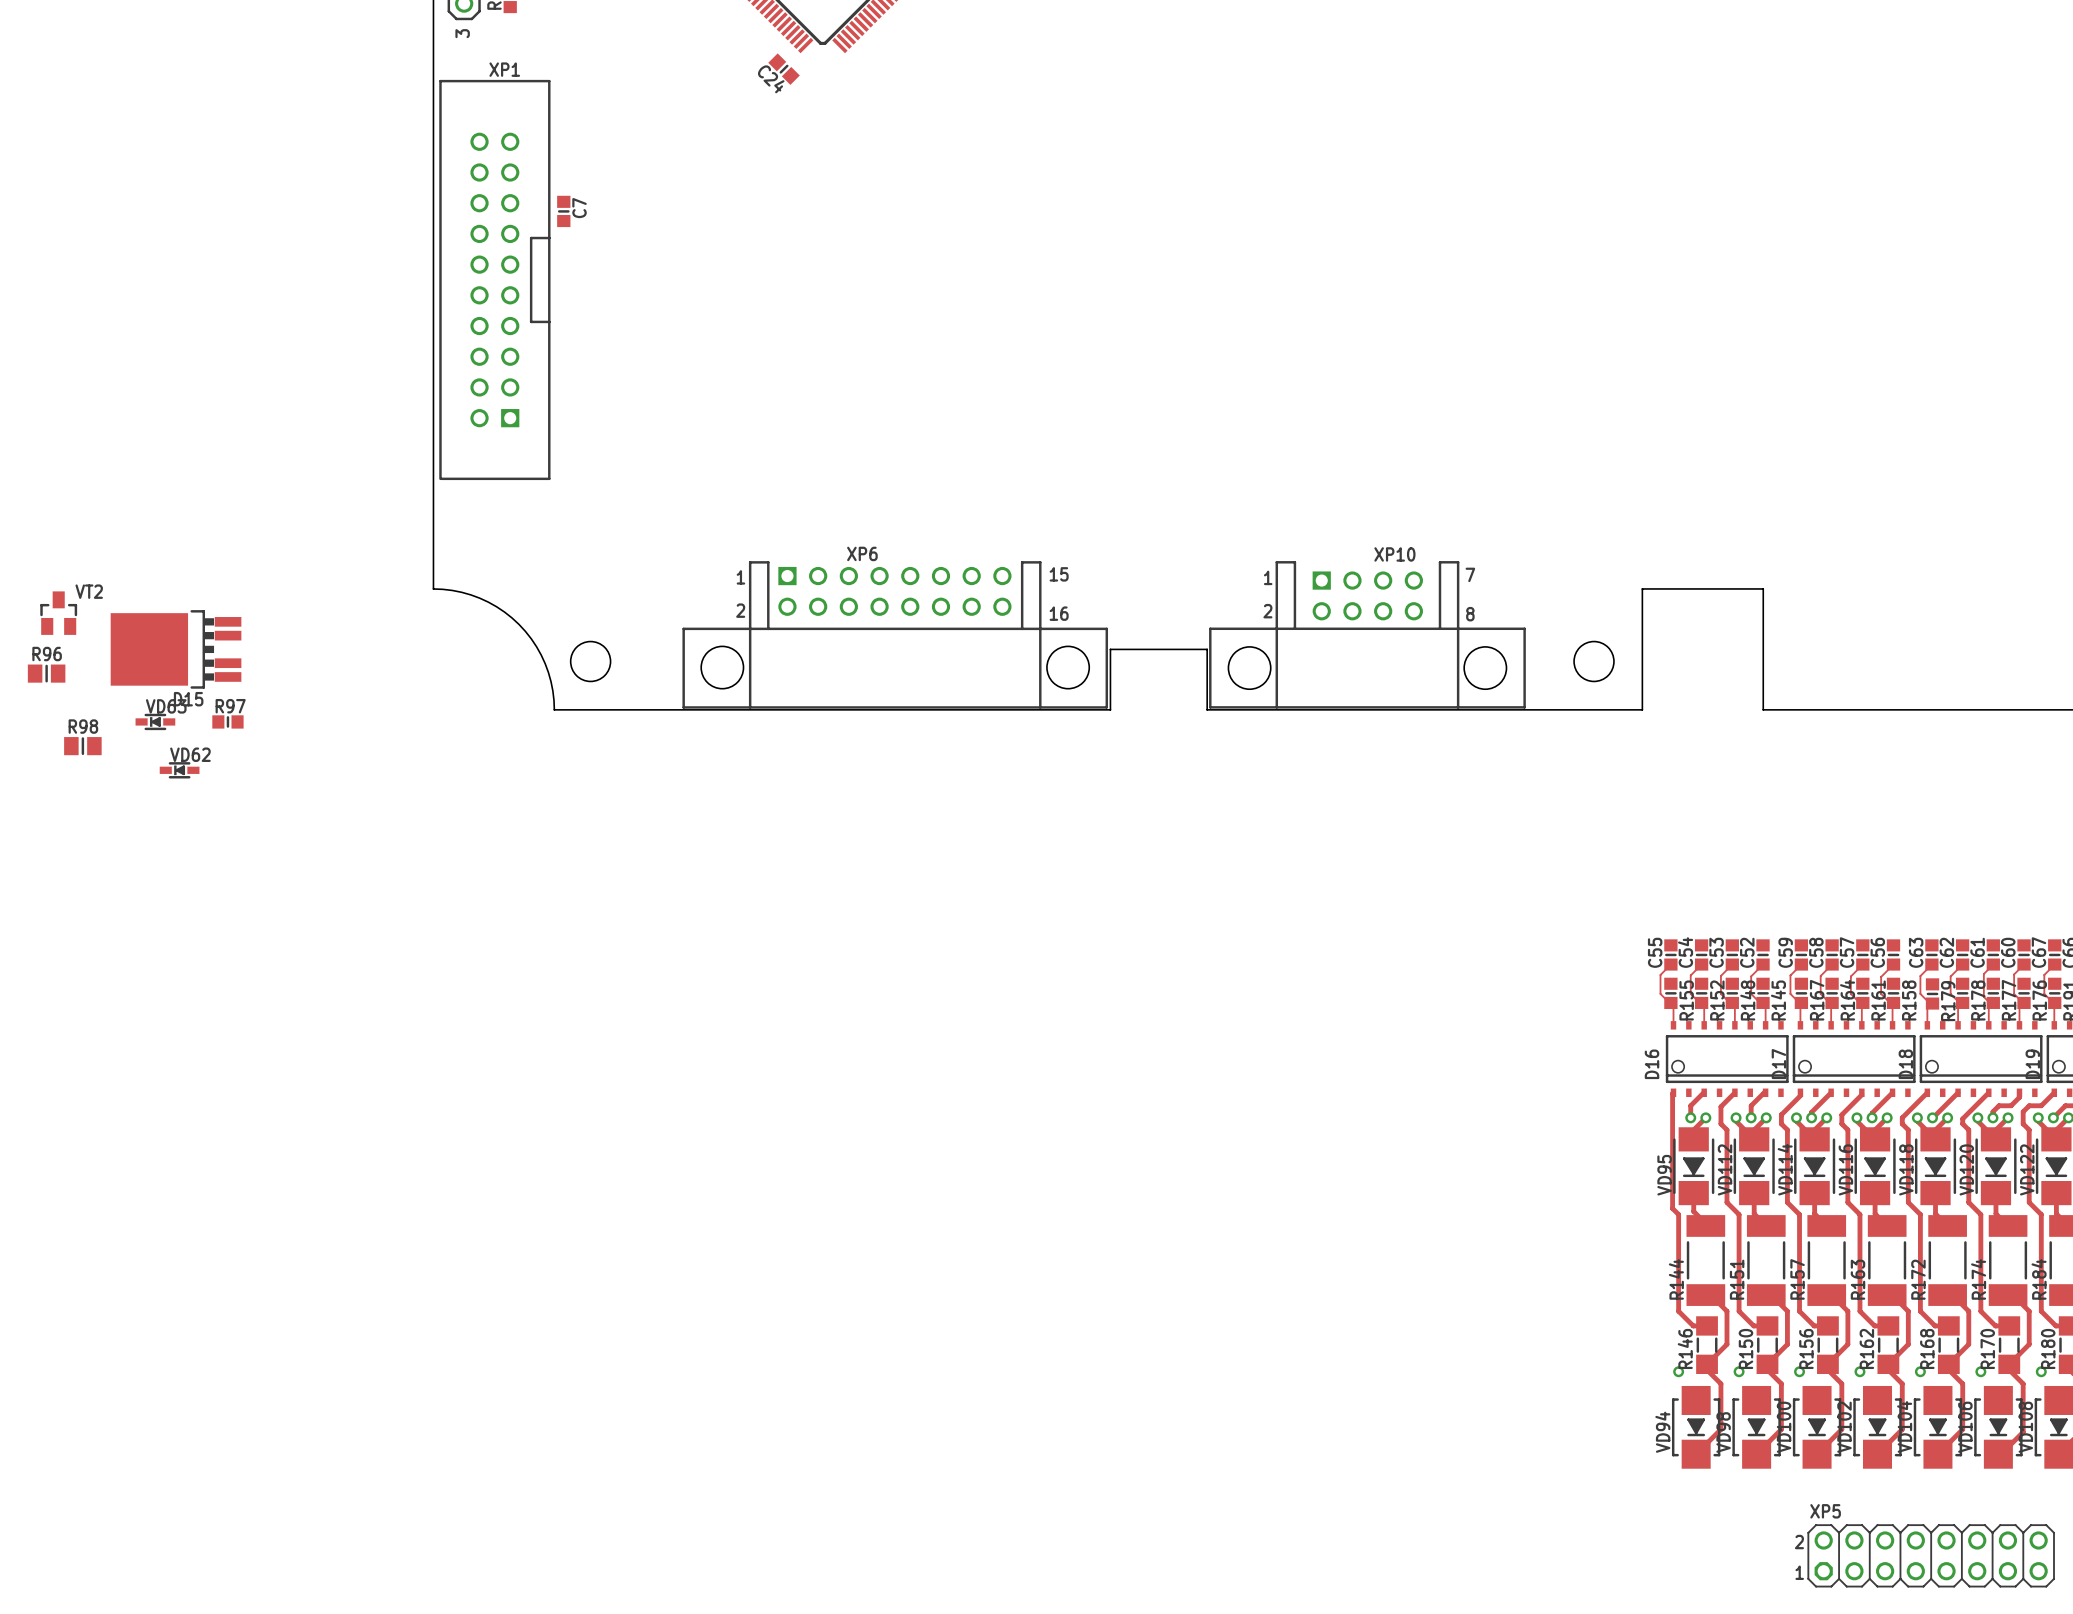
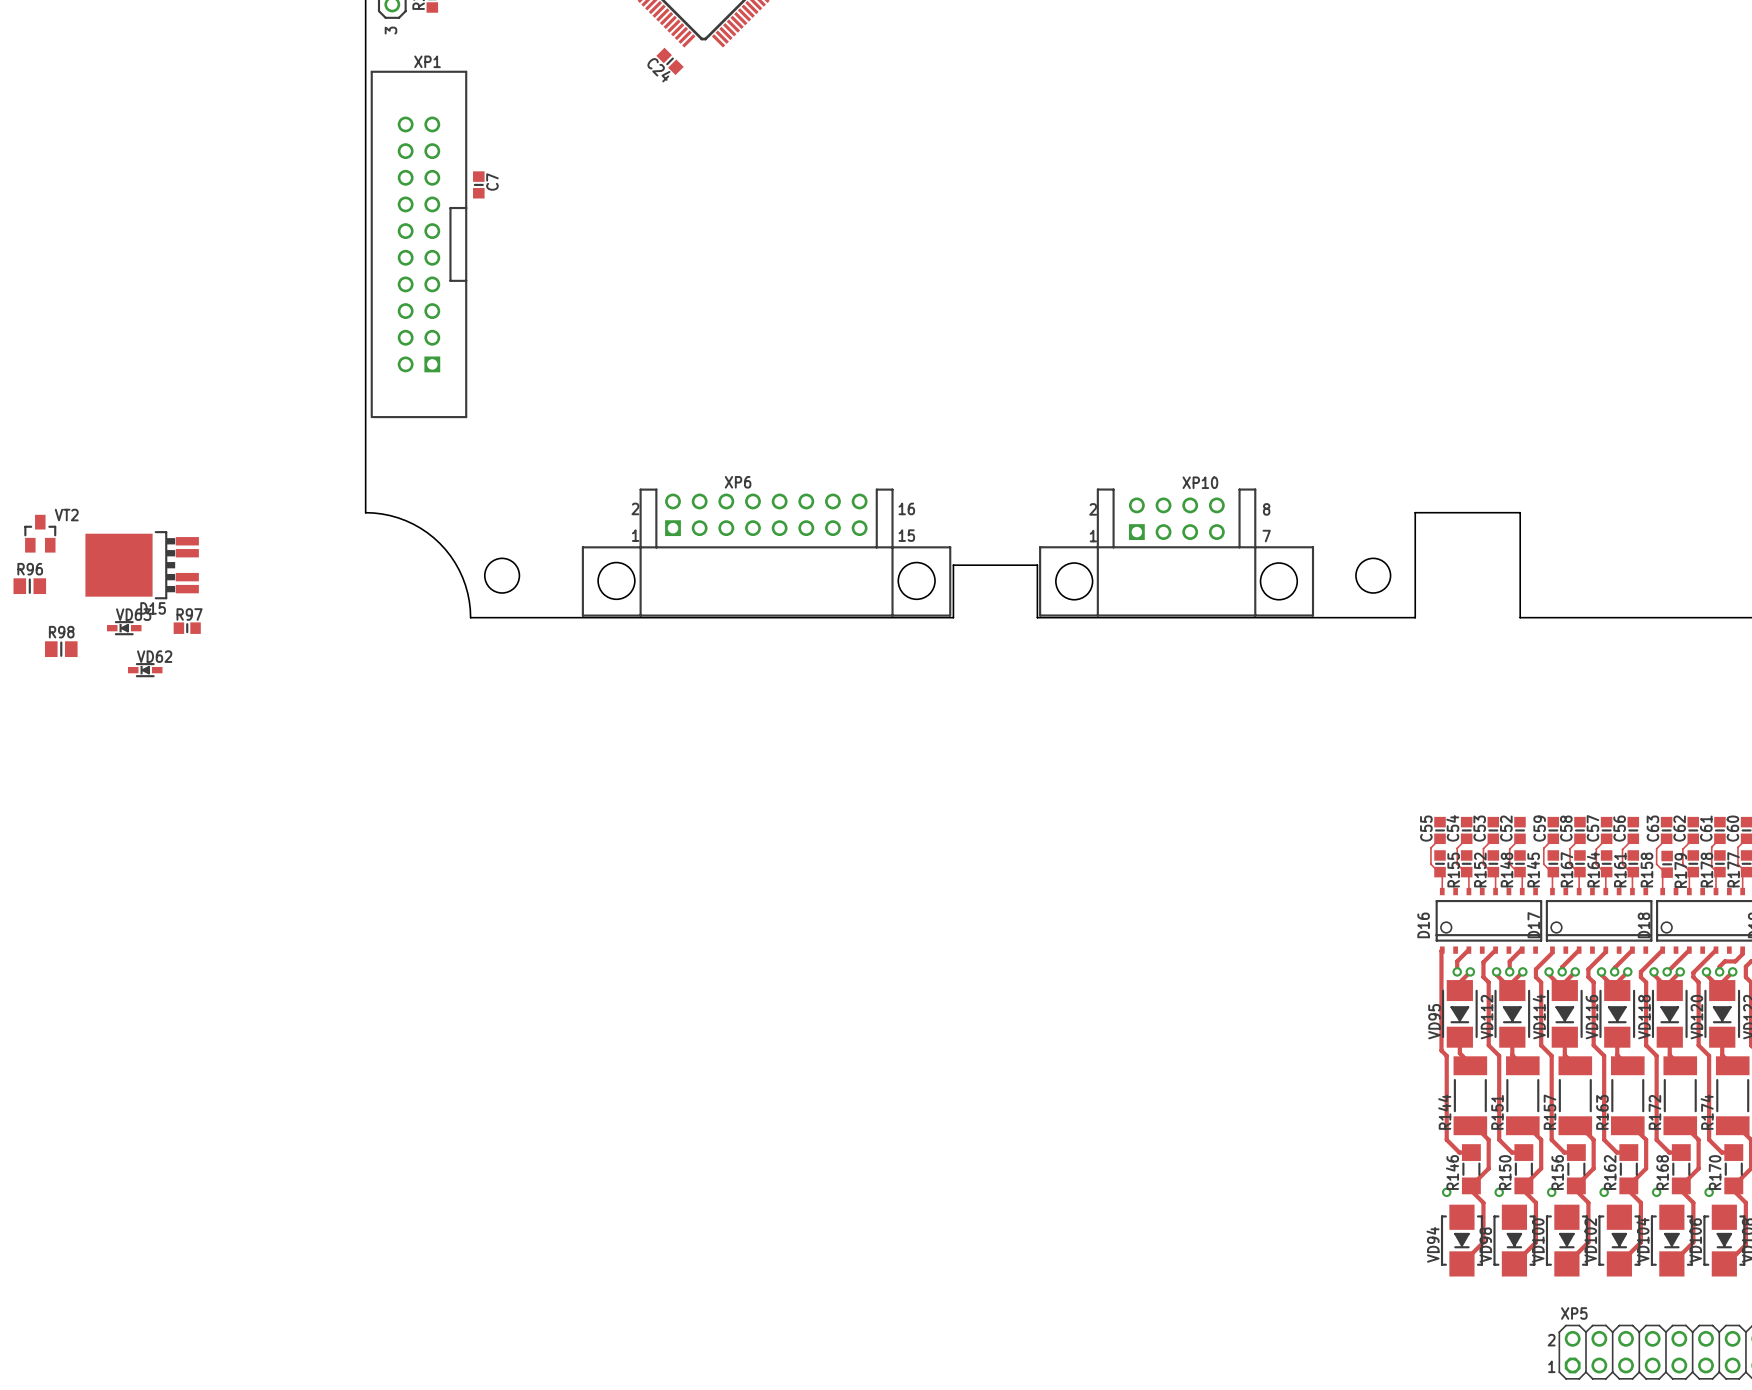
XP6 footprint: [682, 561, 1109, 709] -> [581, 488, 952, 617]
XP10 footprint: [1209, 561, 1526, 709] -> [1039, 488, 1315, 617]

